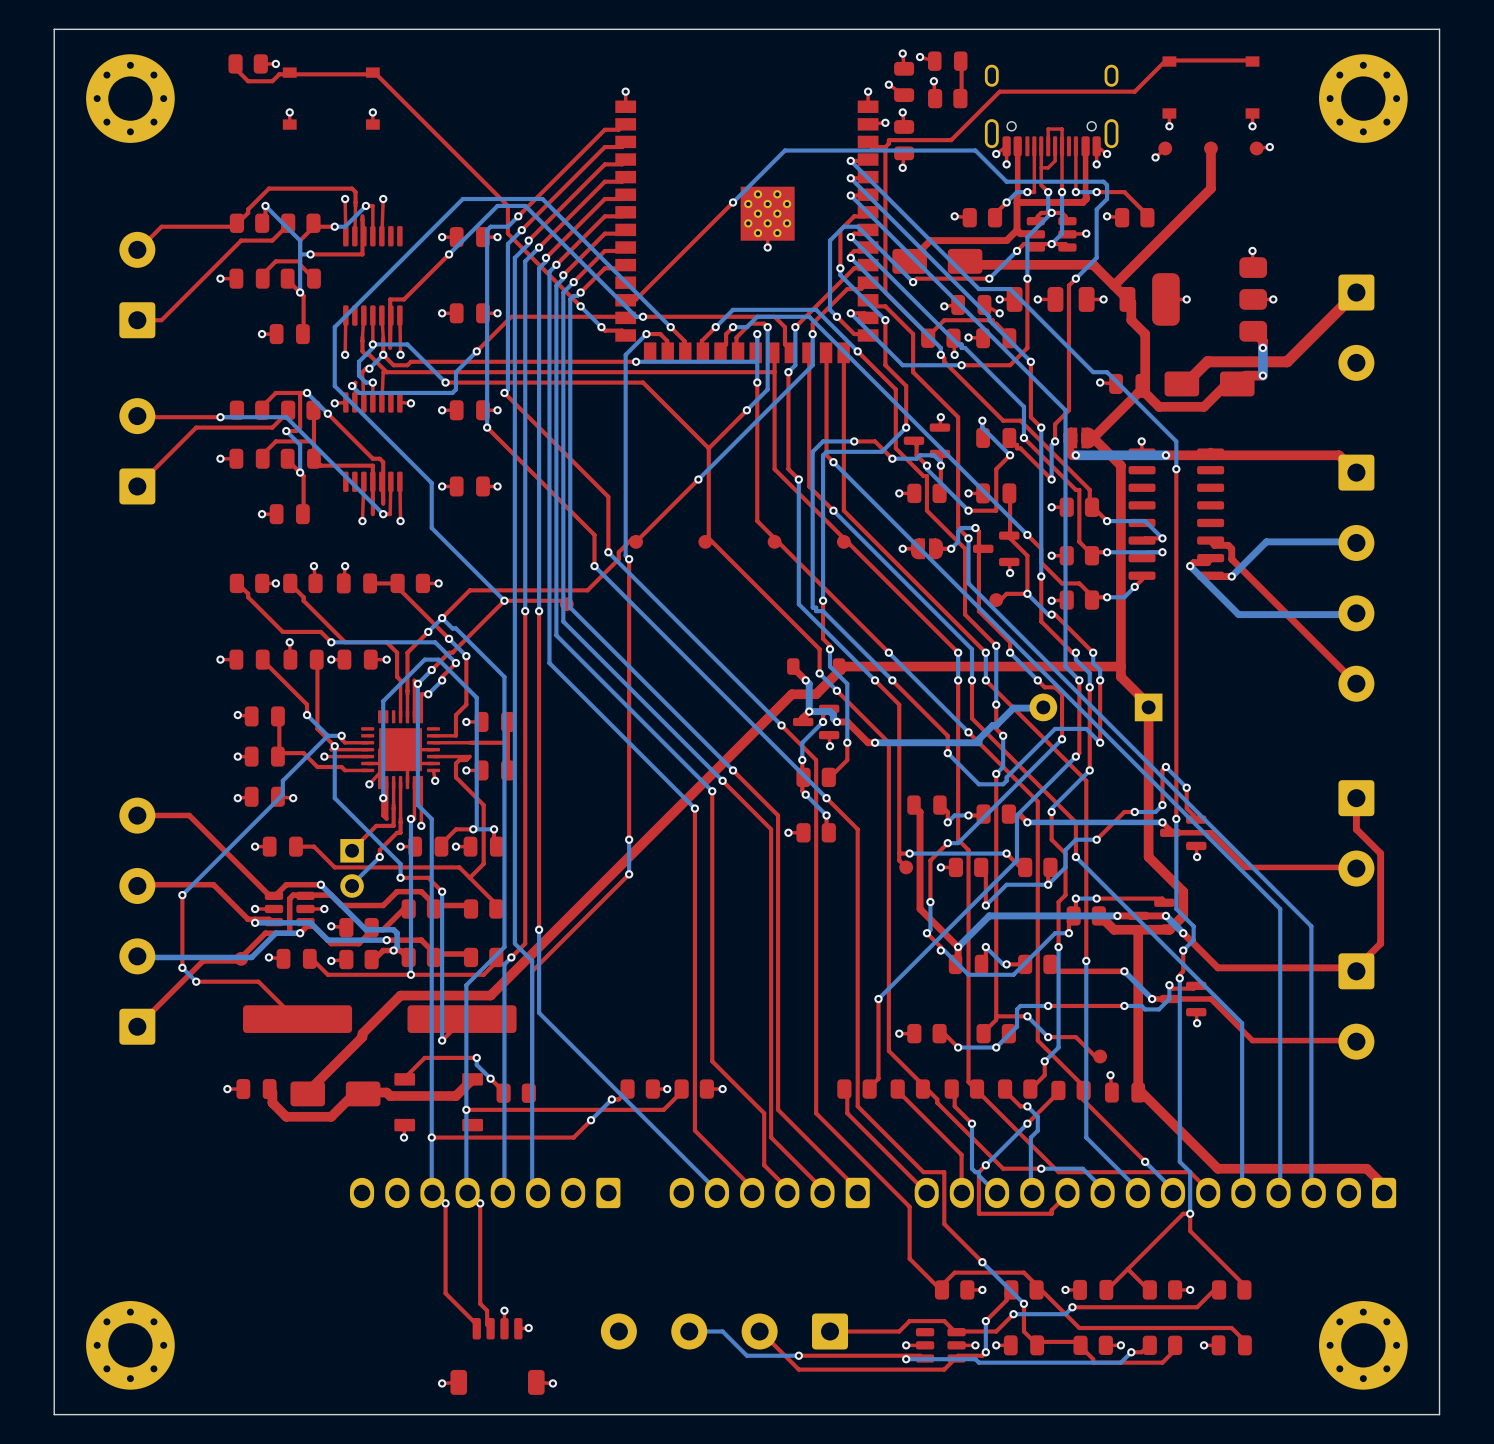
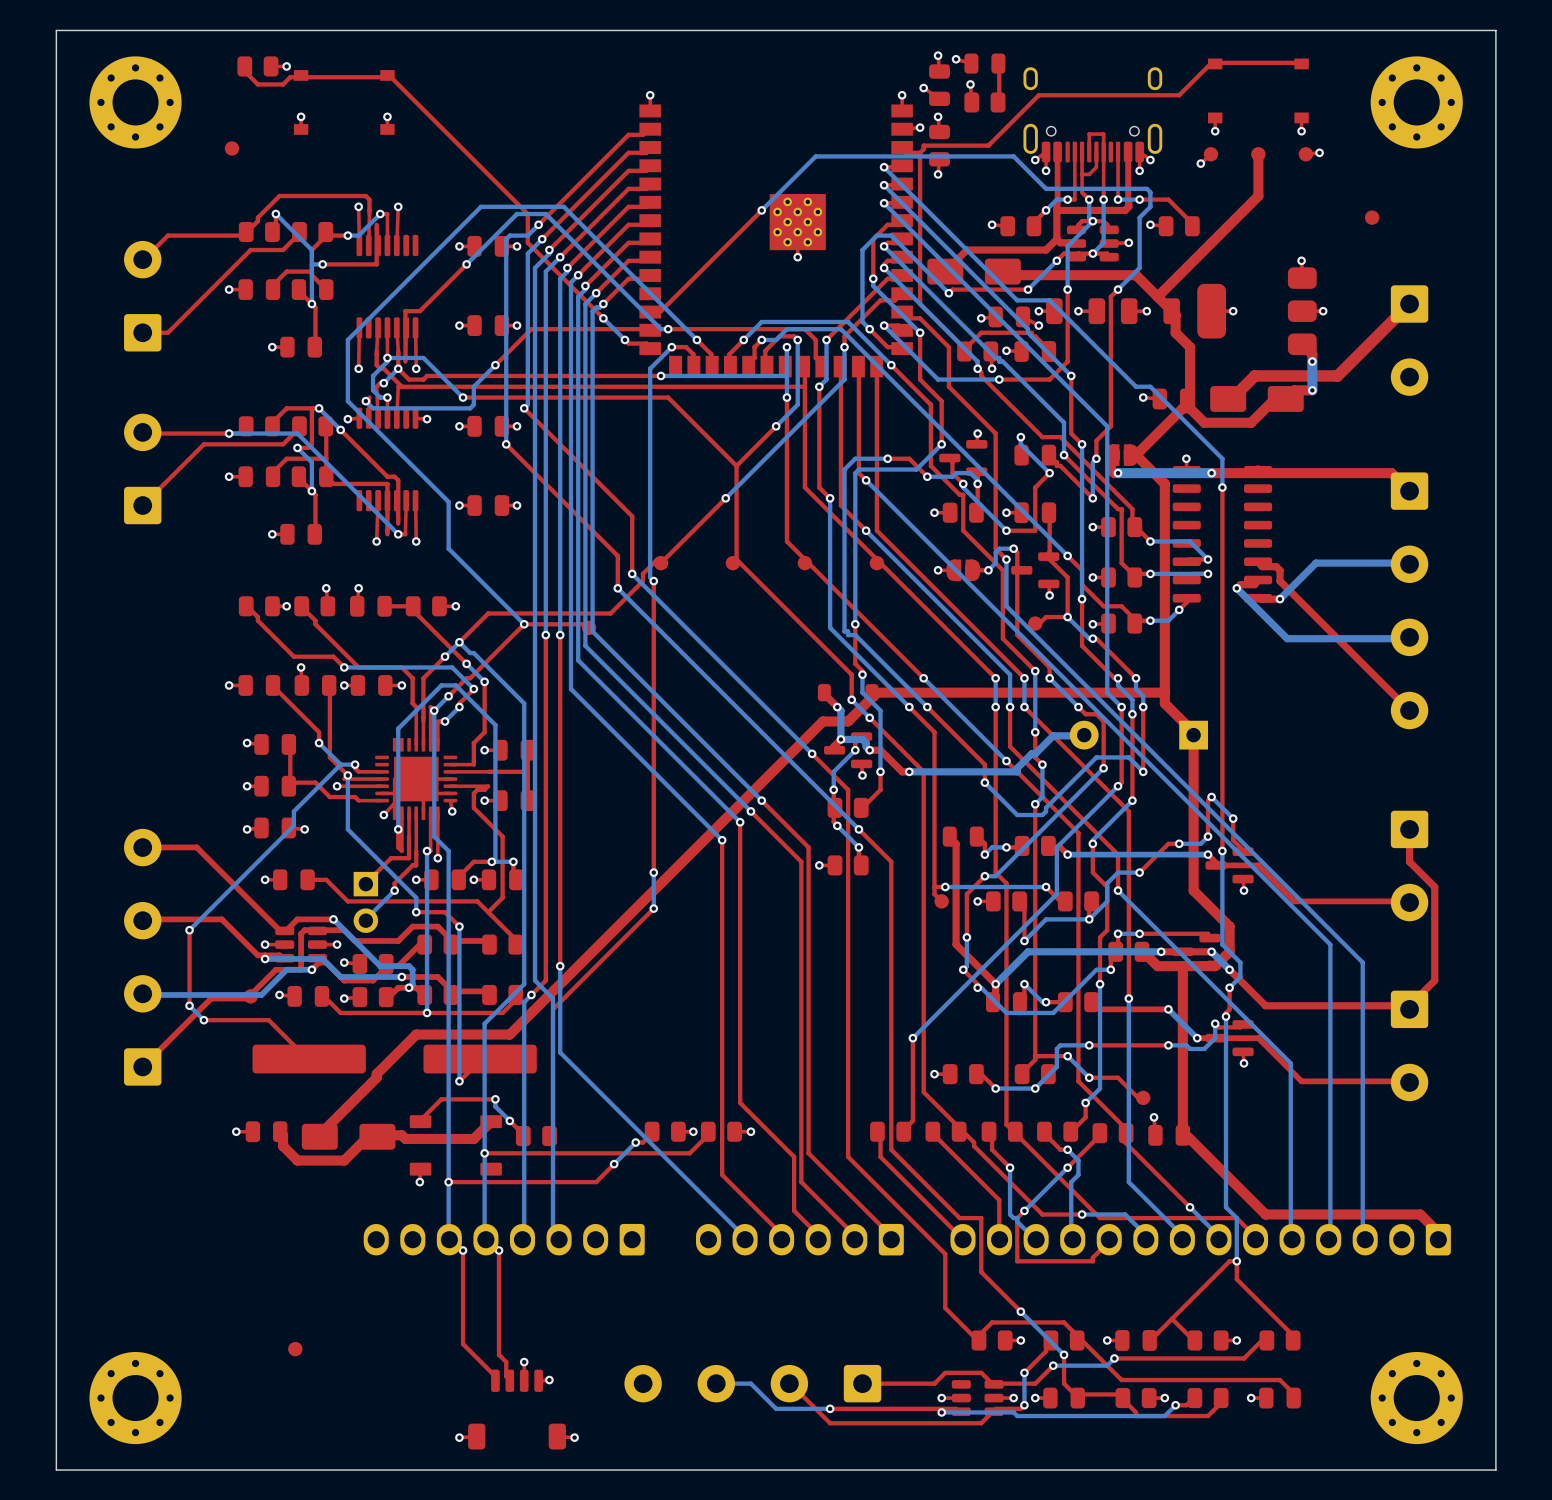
part: none -> (231, 148)
part: none -> (1372, 217)
part: none -> (295, 1349)

